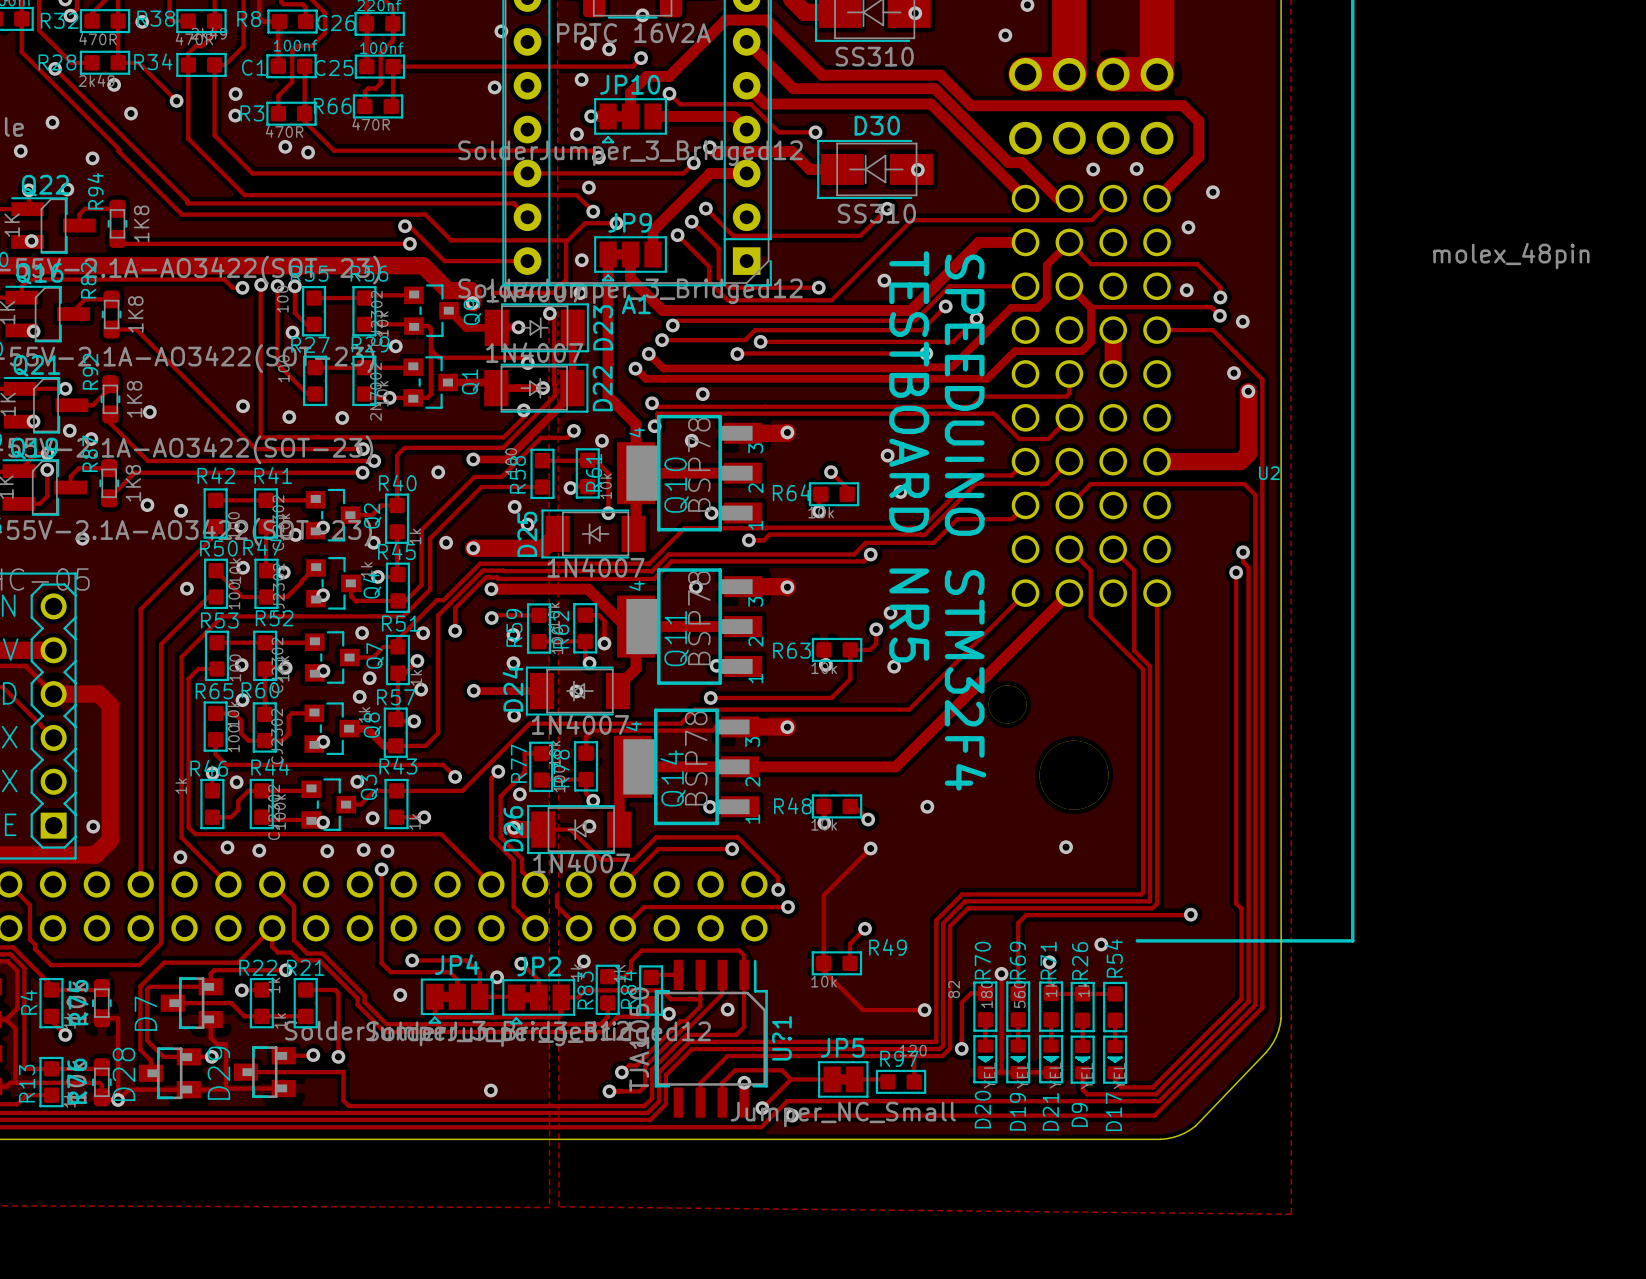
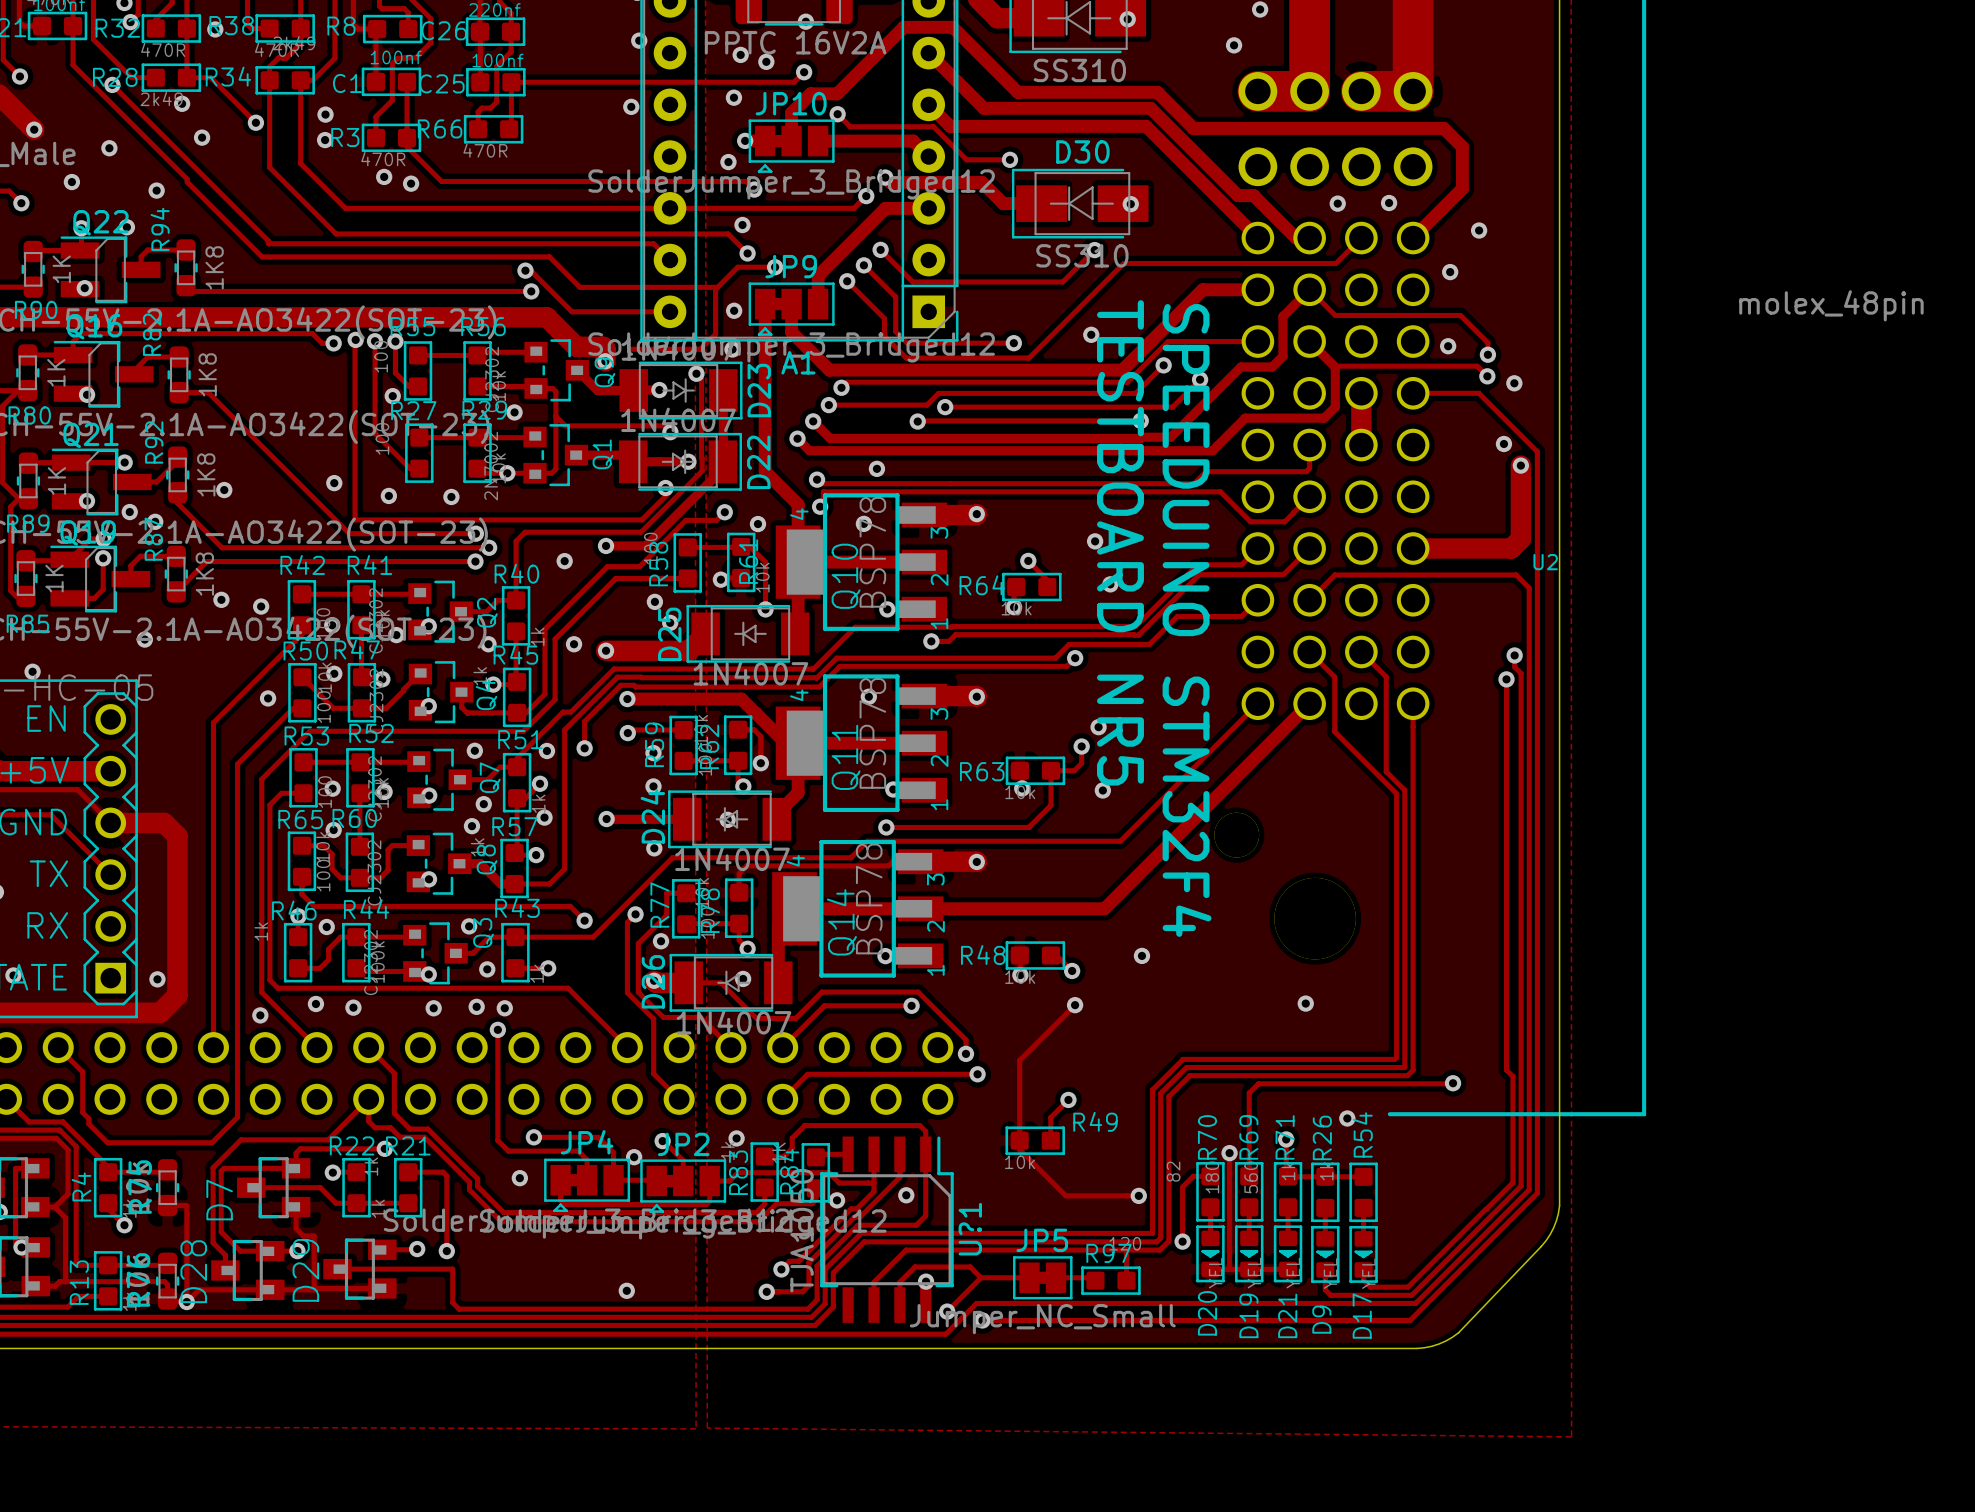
track: (522, 858) (522, 871) (535, 884) -> (663, 1017) (700, 1017) (730, 1047)
track: (556, 894) (556, 906) (579, 928) -> none

